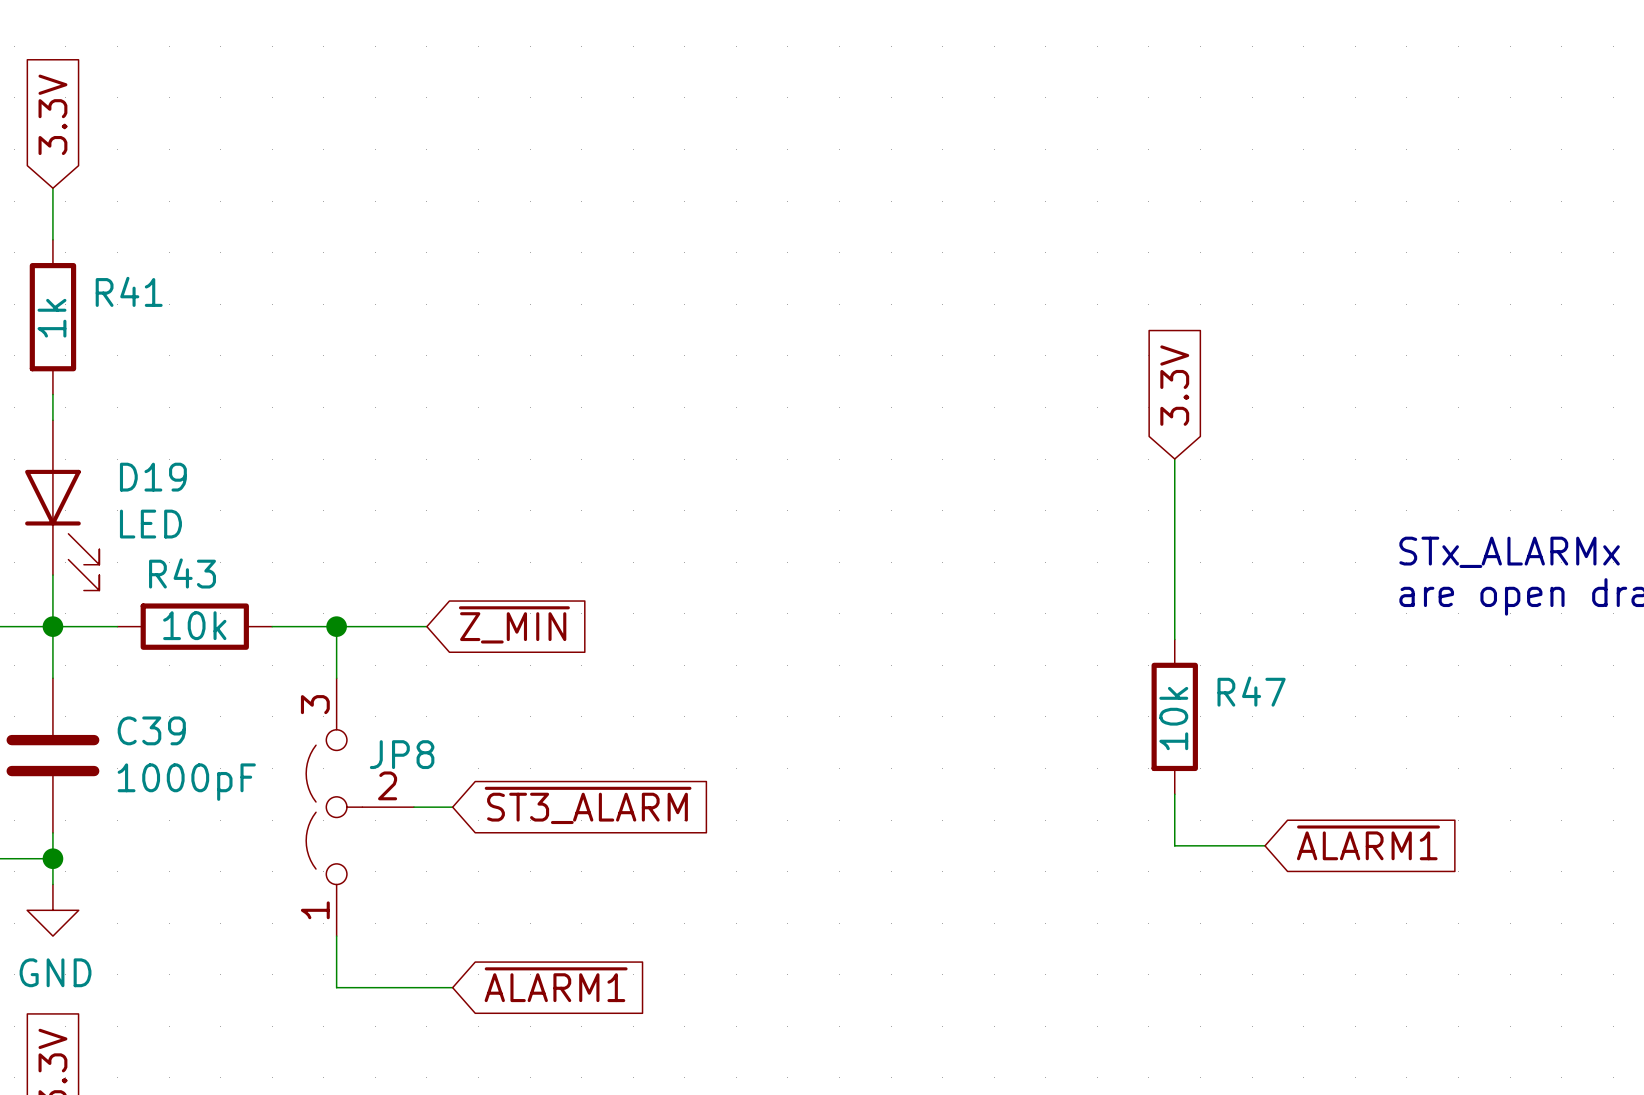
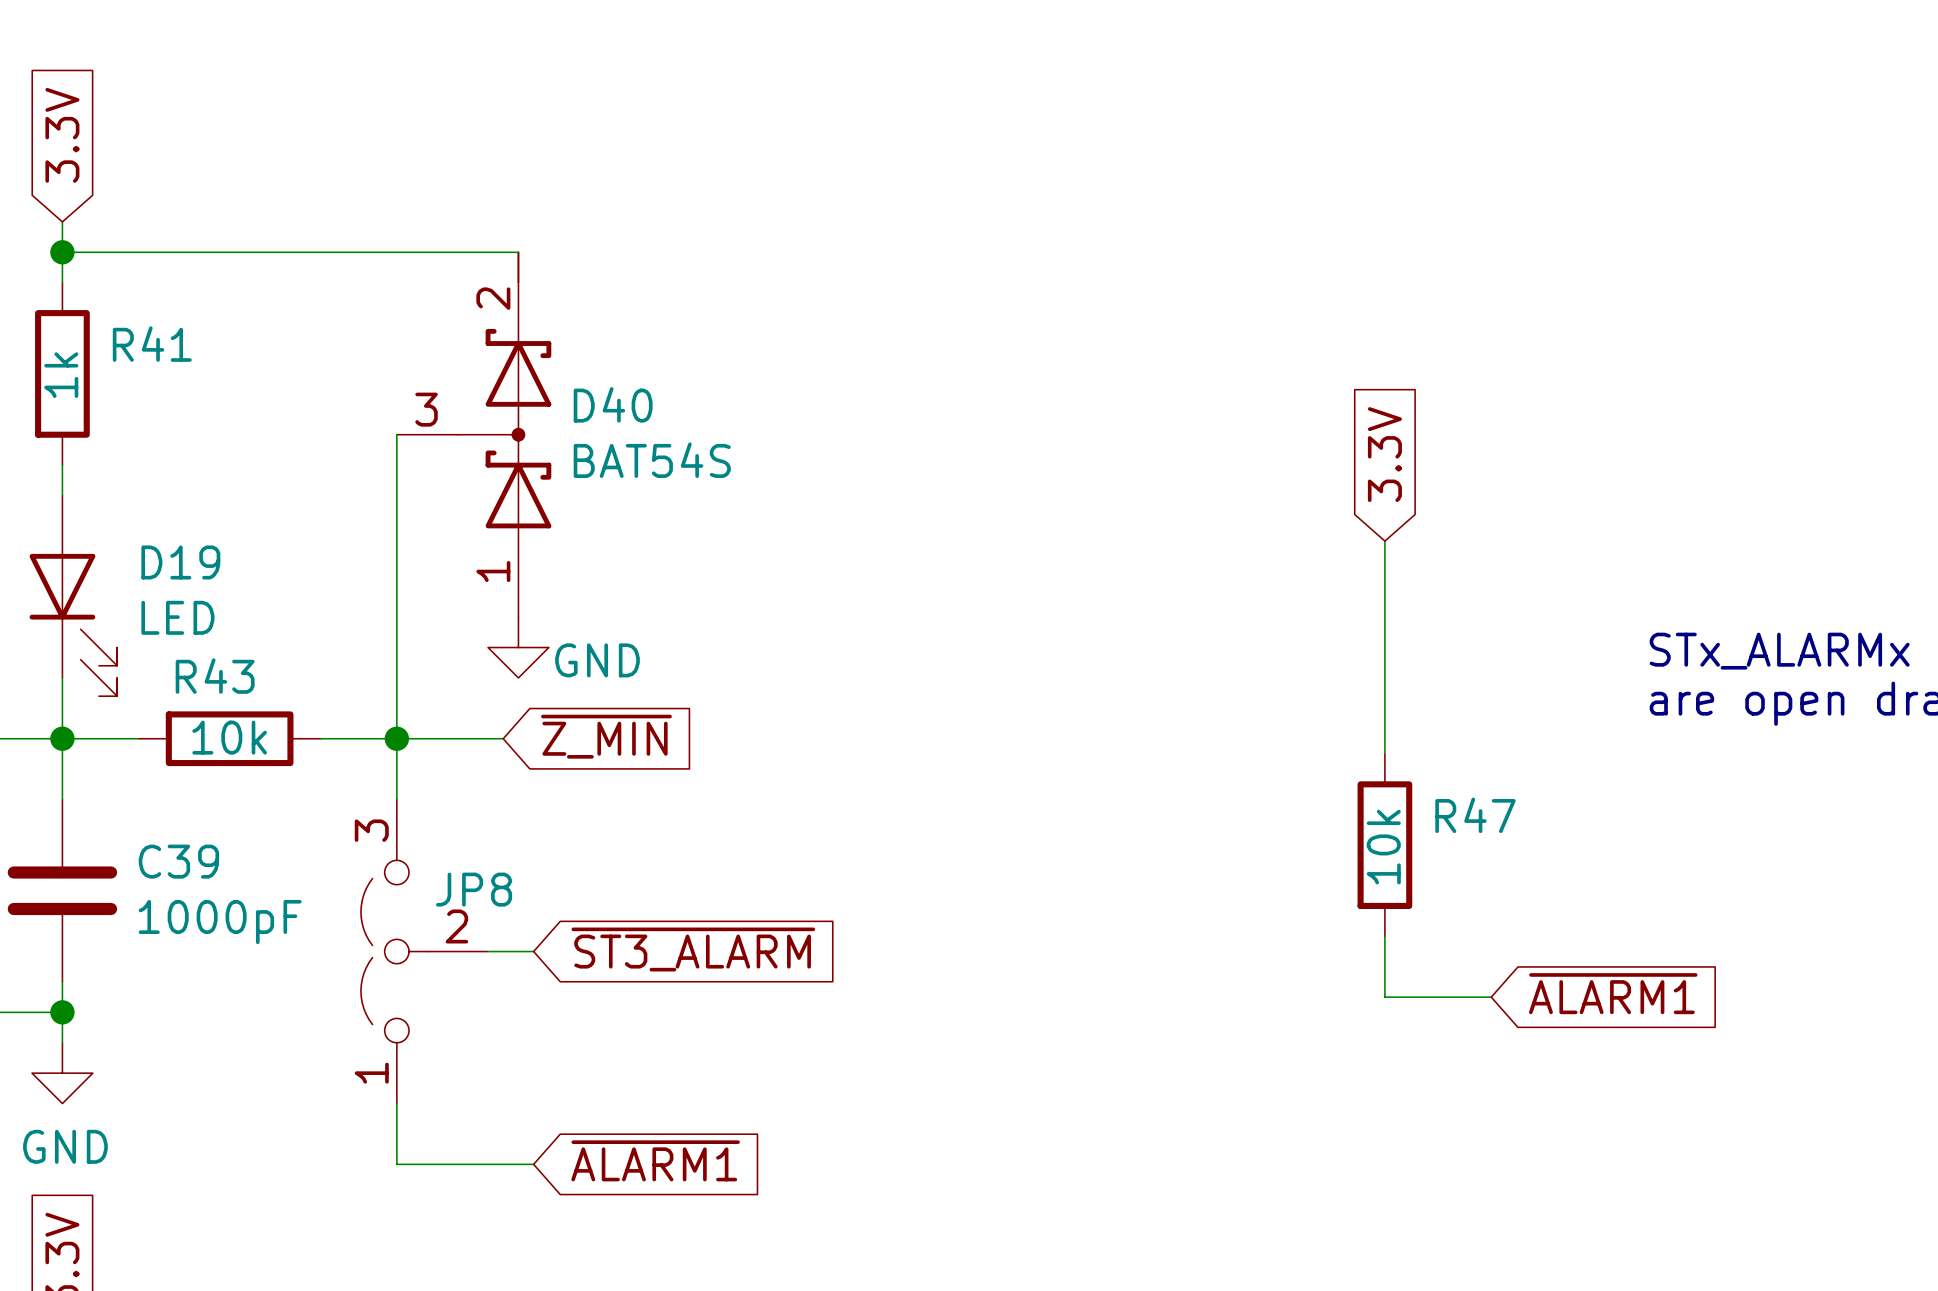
wire: none -> (62, 252) (518, 252)
junction: none -> (62, 252)
wire: none -> (396, 434) (396, 738)
D40: none -> BAT54S (474, 434)
power symbol: none -> GND (518, 647)

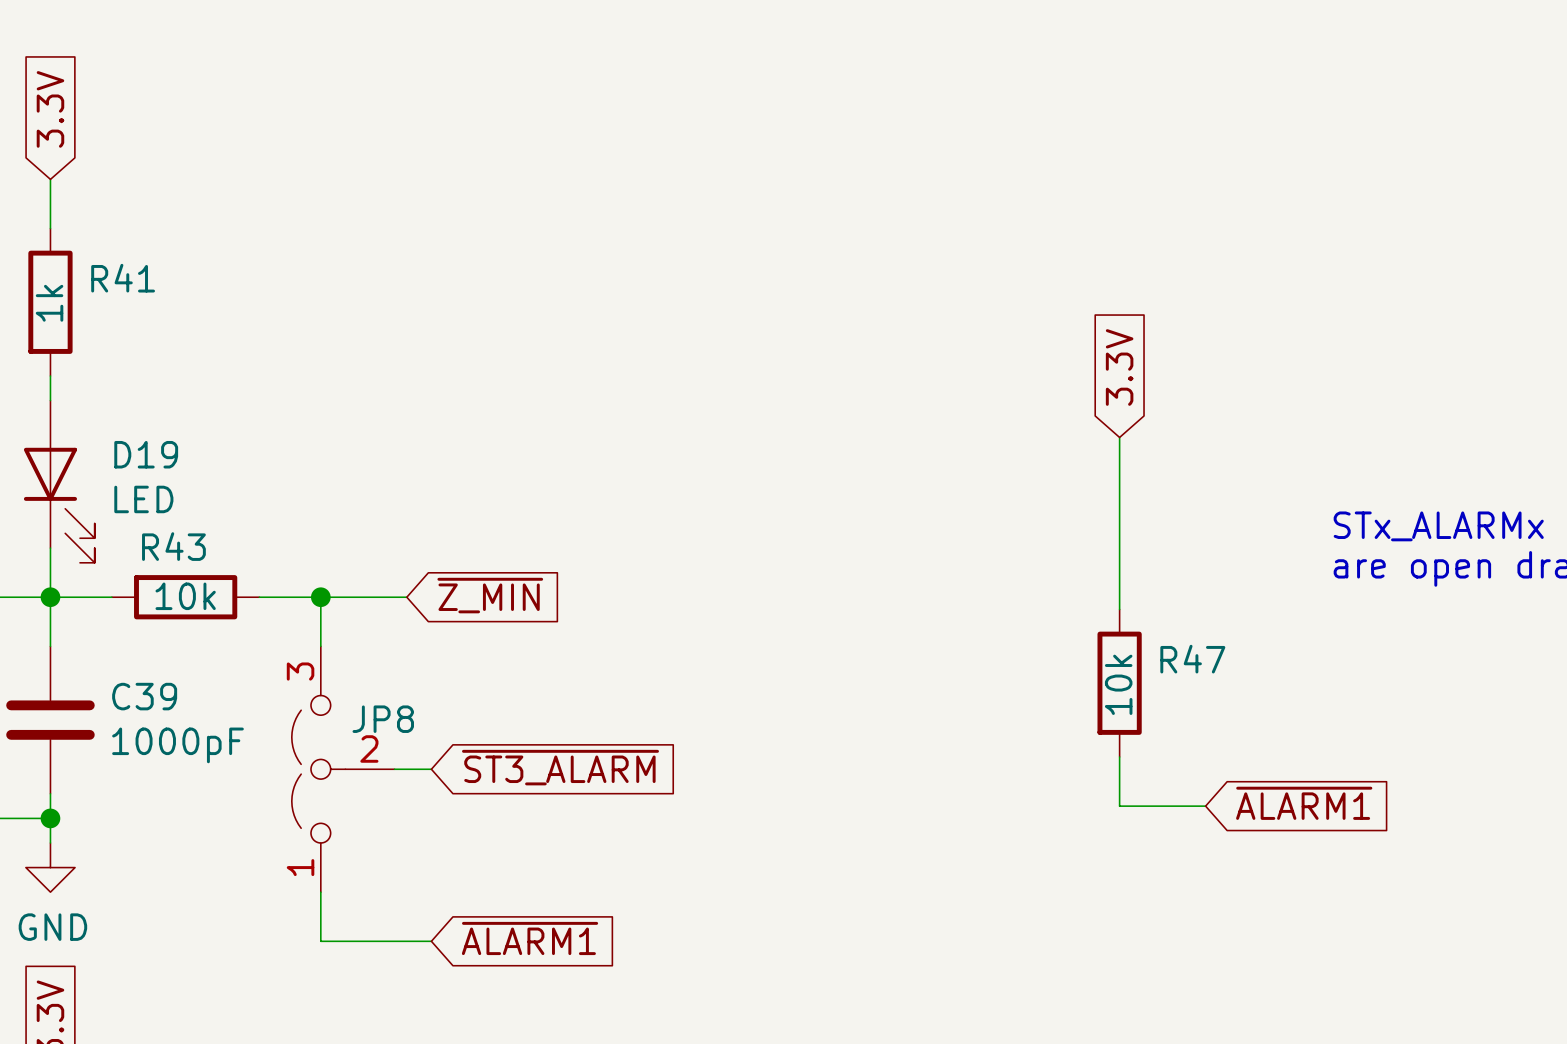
wire: (62, 252) (518, 252) -> none
junction: (62, 252) -> none
wire: (396, 434) (396, 738) -> none
D40: BAT54S (474, 434) -> none
power symbol: GND (518, 647) -> none

